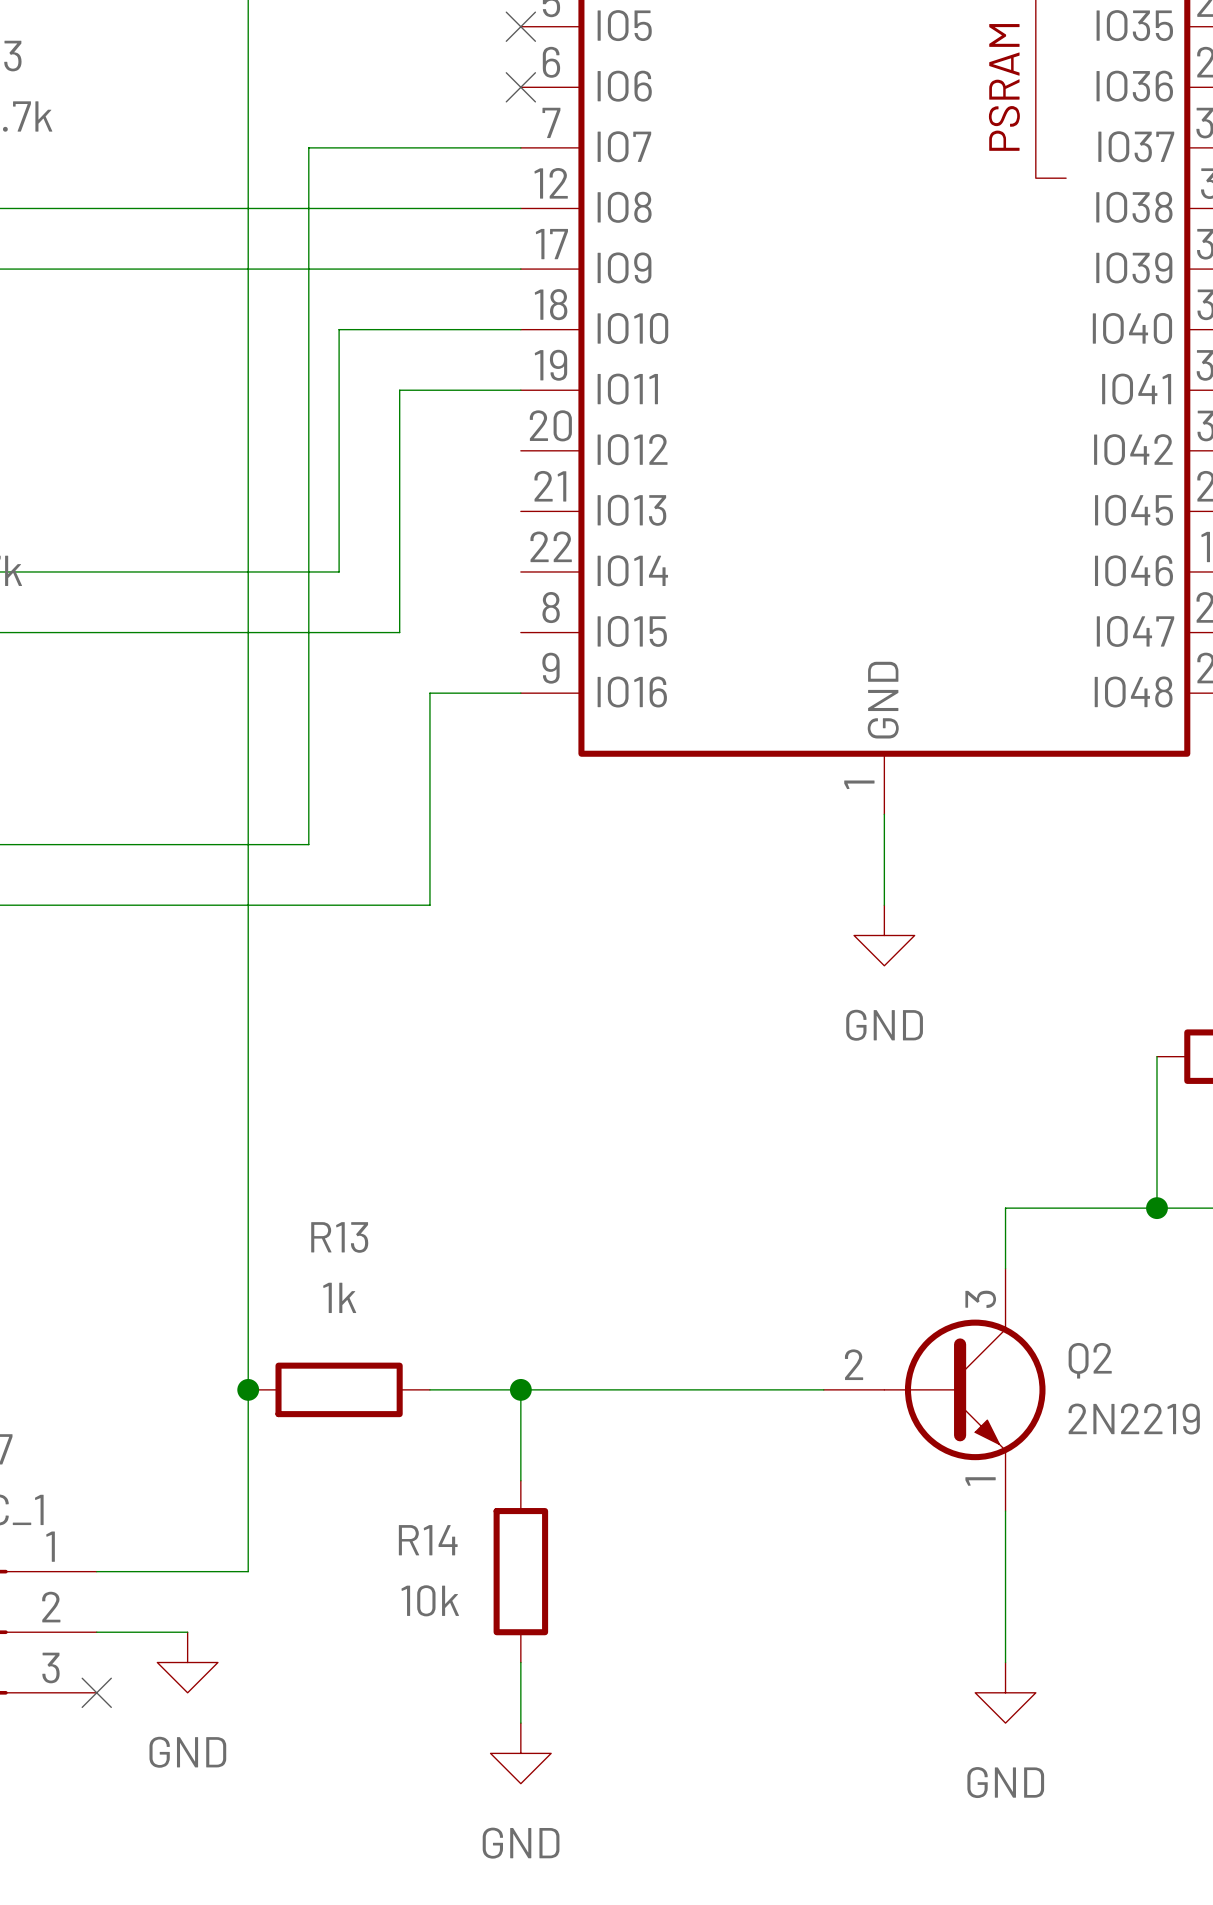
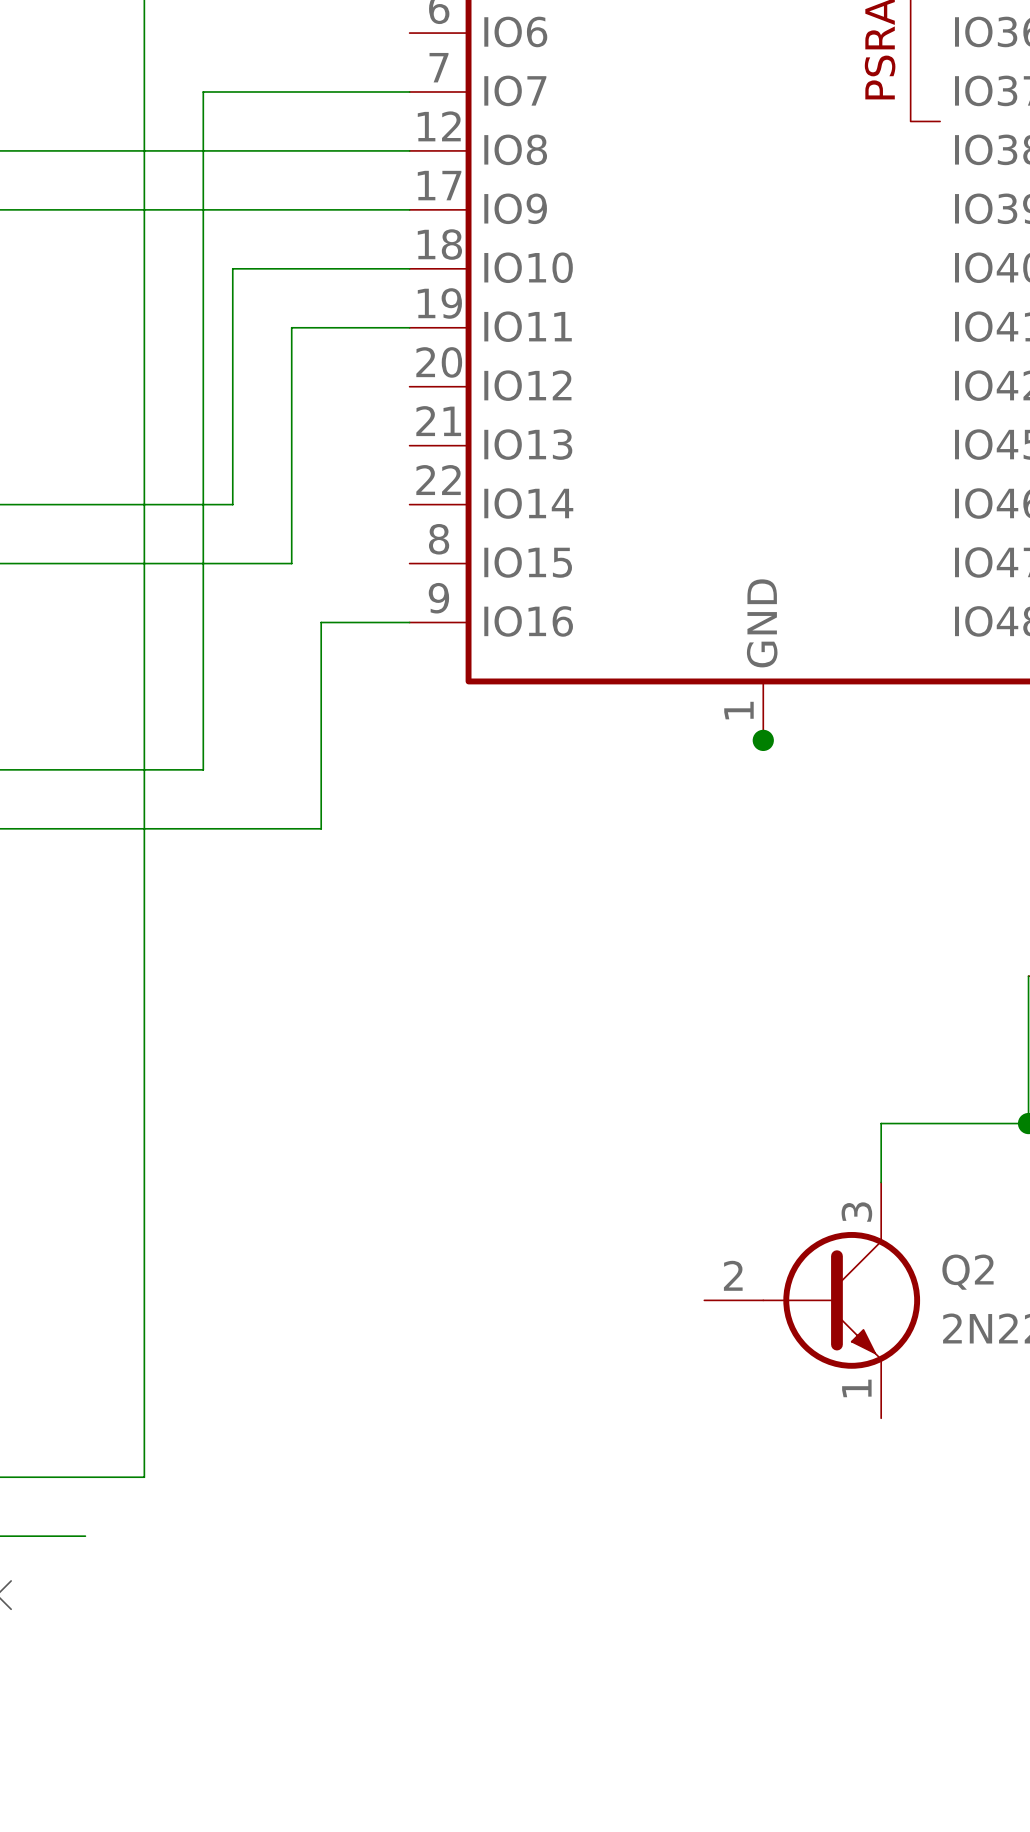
no-connect mark: (520, 87) -> none
wire: (884, 814) (884, 905) -> none
junction: none -> (763, 740)
power symbol: GND (884, 935) -> none
junction: (248, 1389) -> none
R13: 1k (339, 1389) -> none
wire: (429, 1389) (823, 1389) -> none
wire: (520, 1389) (520, 1480) -> none
junction: (520, 1389) -> none
wire: (1005, 1511) (1005, 1662) -> none
R14: 10k (520, 1571) -> none
power symbol: GND (187, 1662) -> none
wire: (520, 1662) (520, 1723) -> none
power symbol: GND (1005, 1692) -> none
power symbol: GND (520, 1753) -> none

